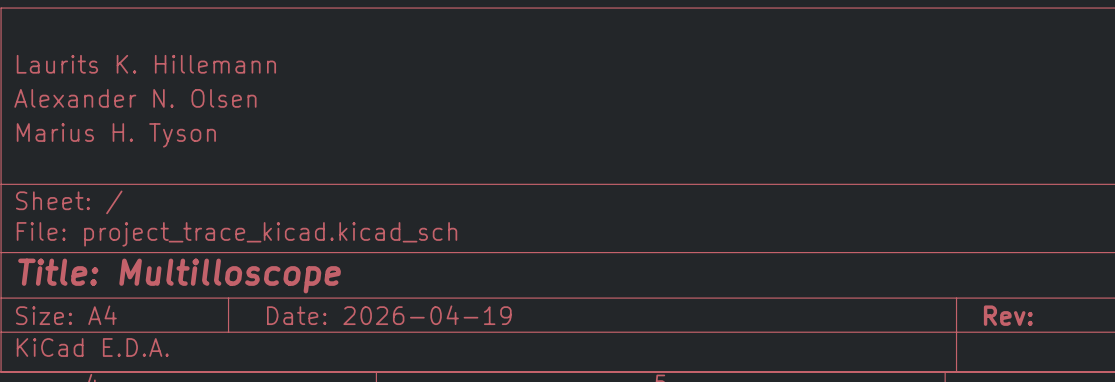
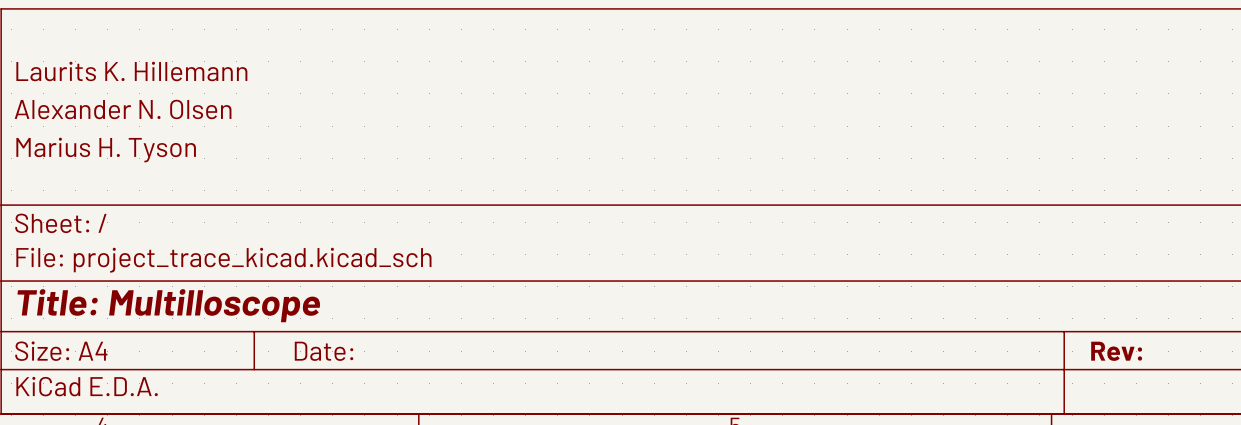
title block: Date: 2026-04-19 (389, 315) -> Date: (324, 351)

